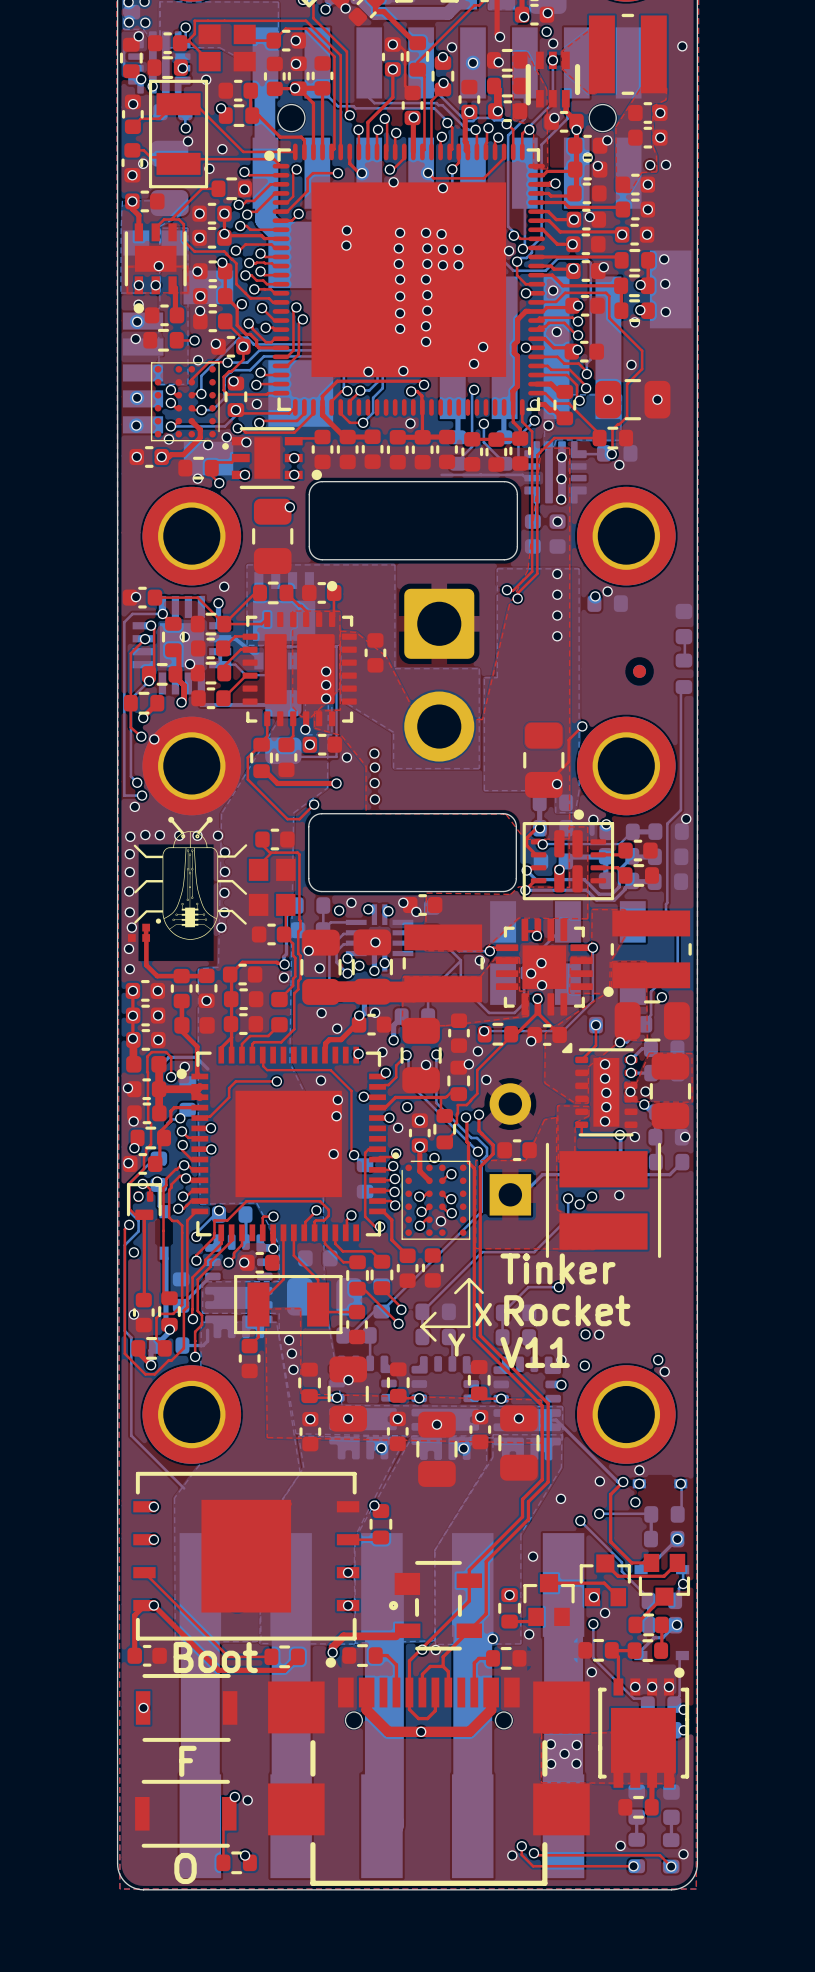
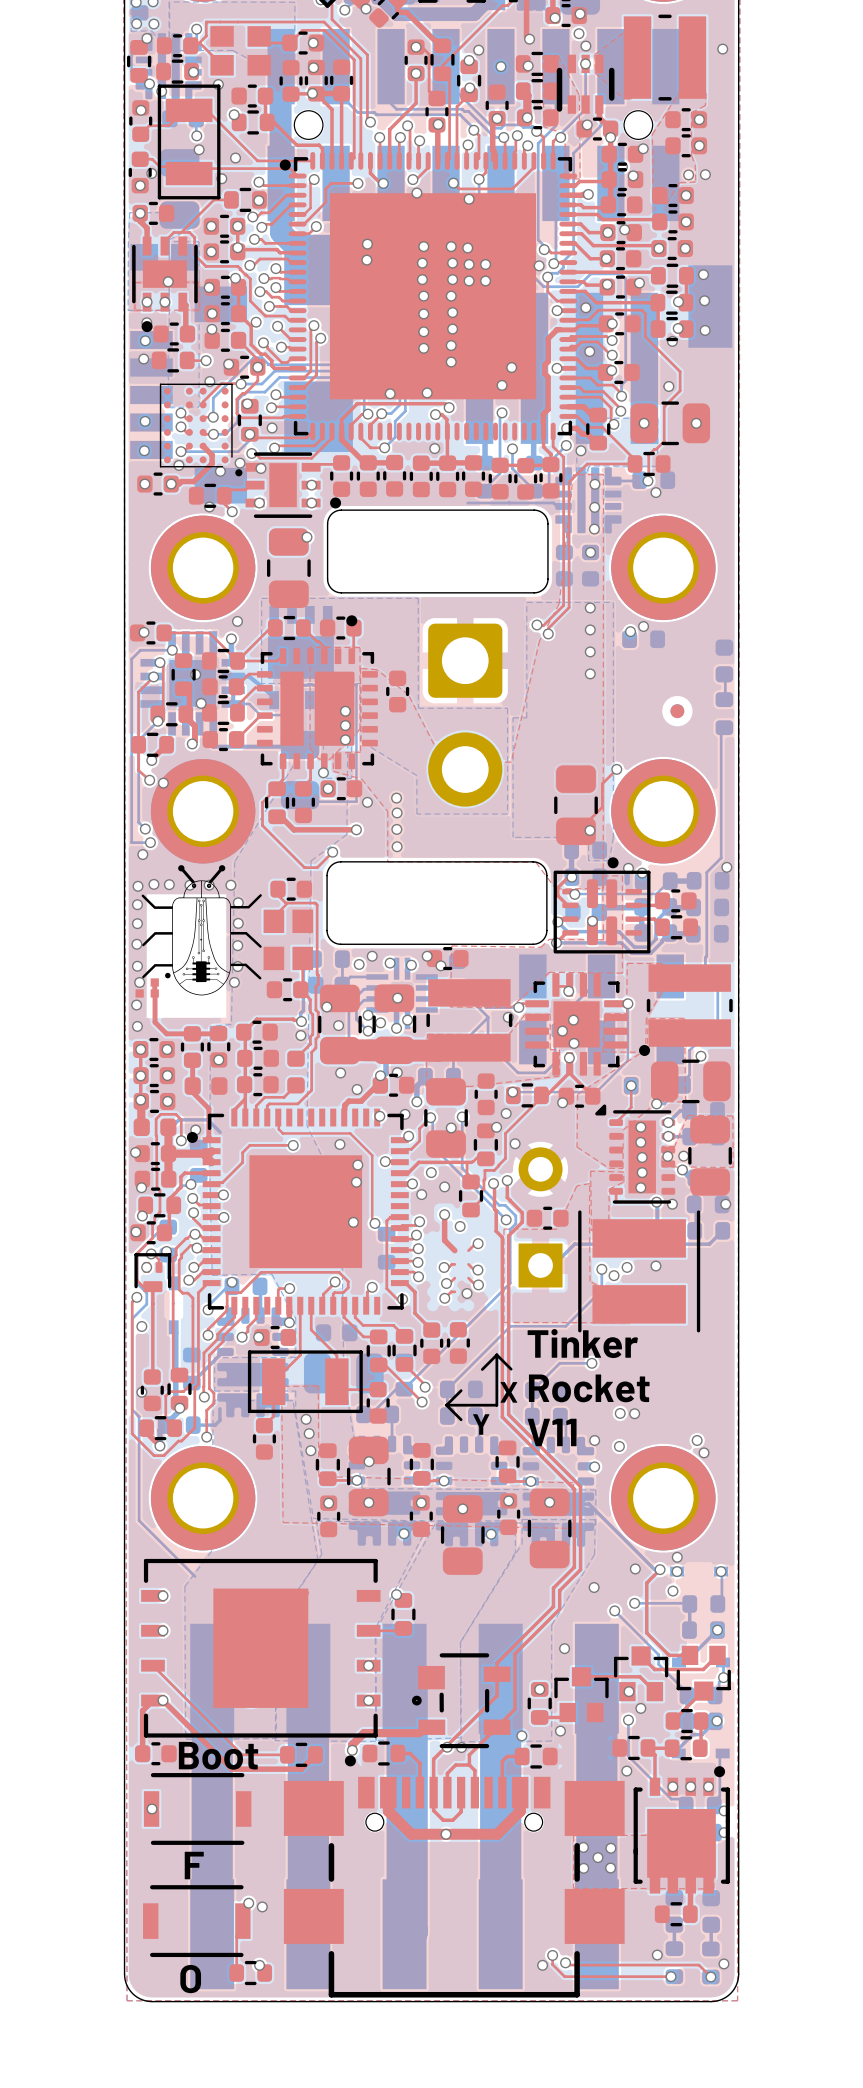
part: (419, 1133) -> none
part: (431, 1196) -> none

